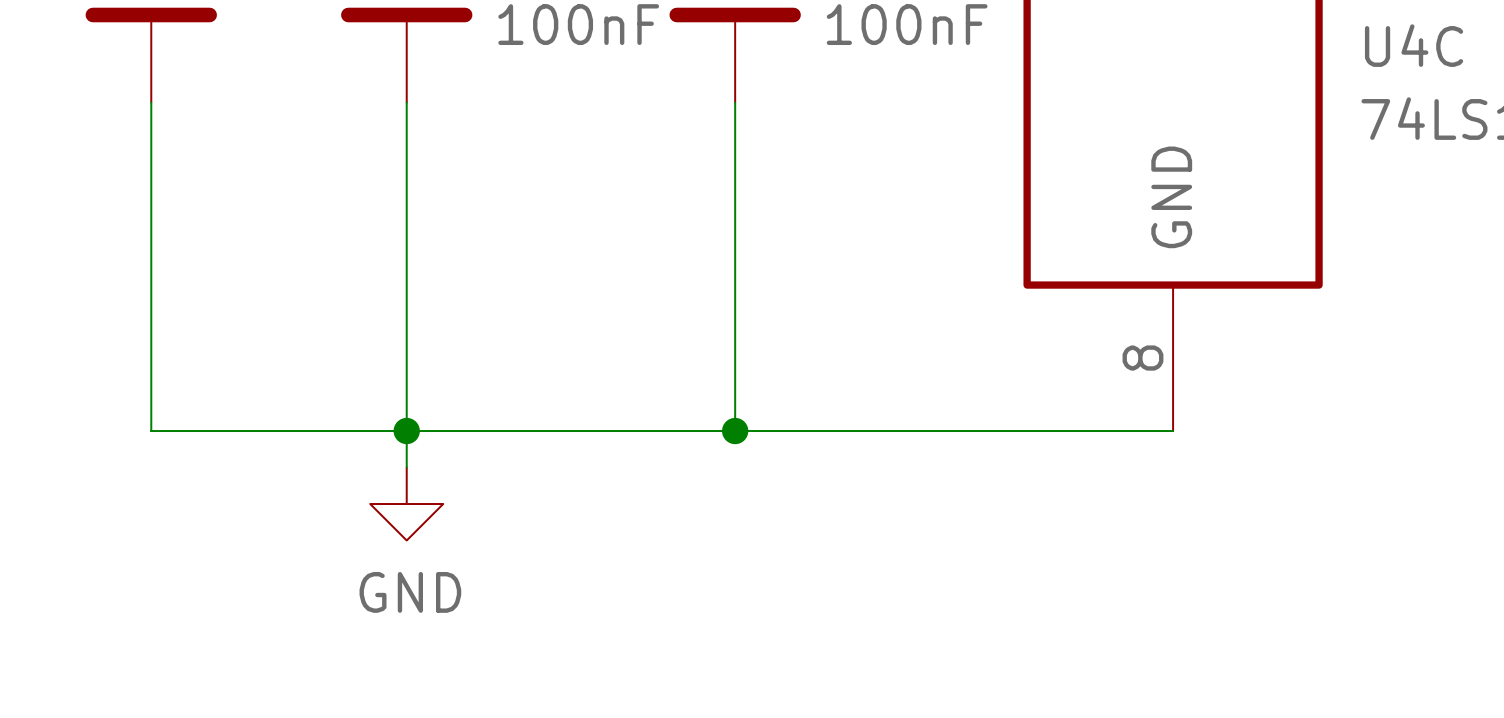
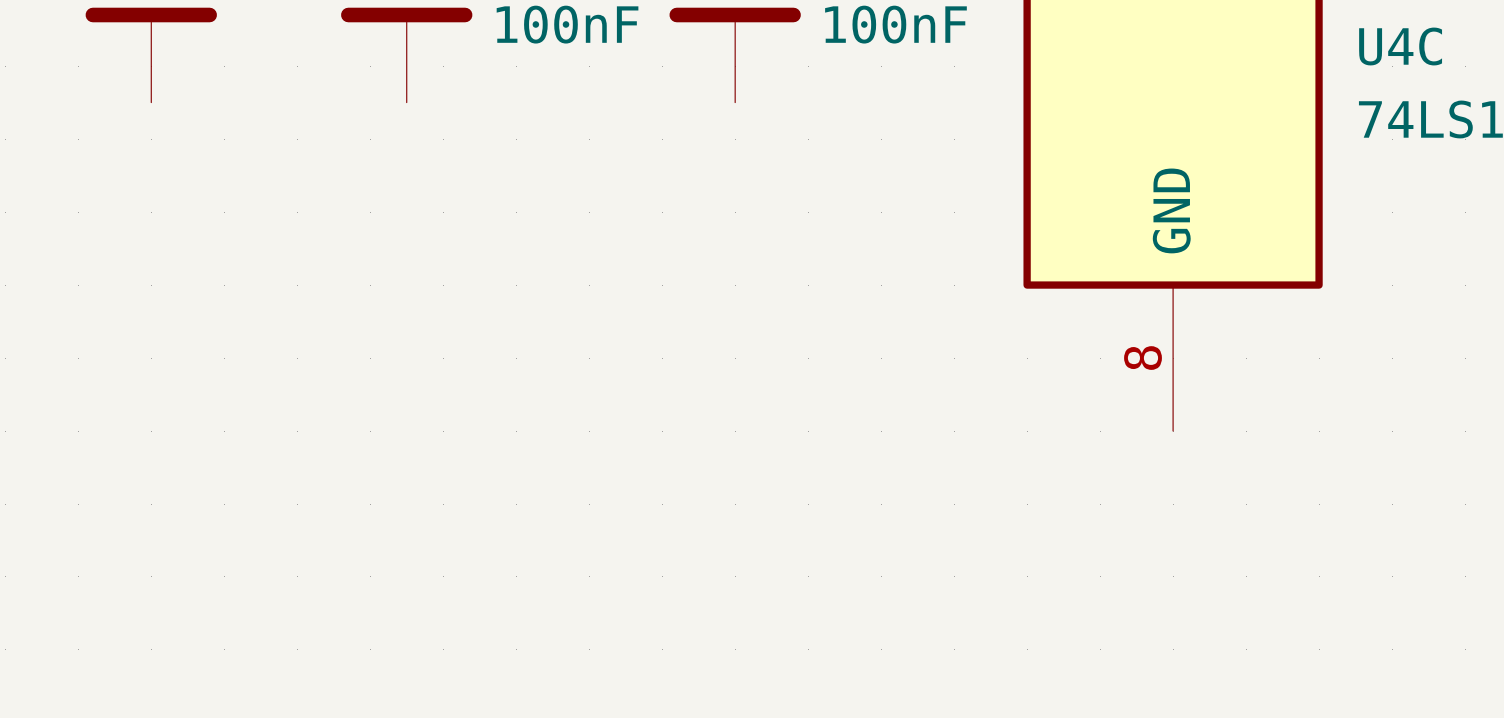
wire: (151, 102) (151, 431) (1173, 431) -> none
wire: (406, 102) (406, 467) -> none
wire: (735, 102) (735, 431) -> none
junction: (406, 431) -> none
junction: (735, 431) -> none
power symbol: GND (406, 504) -> none

